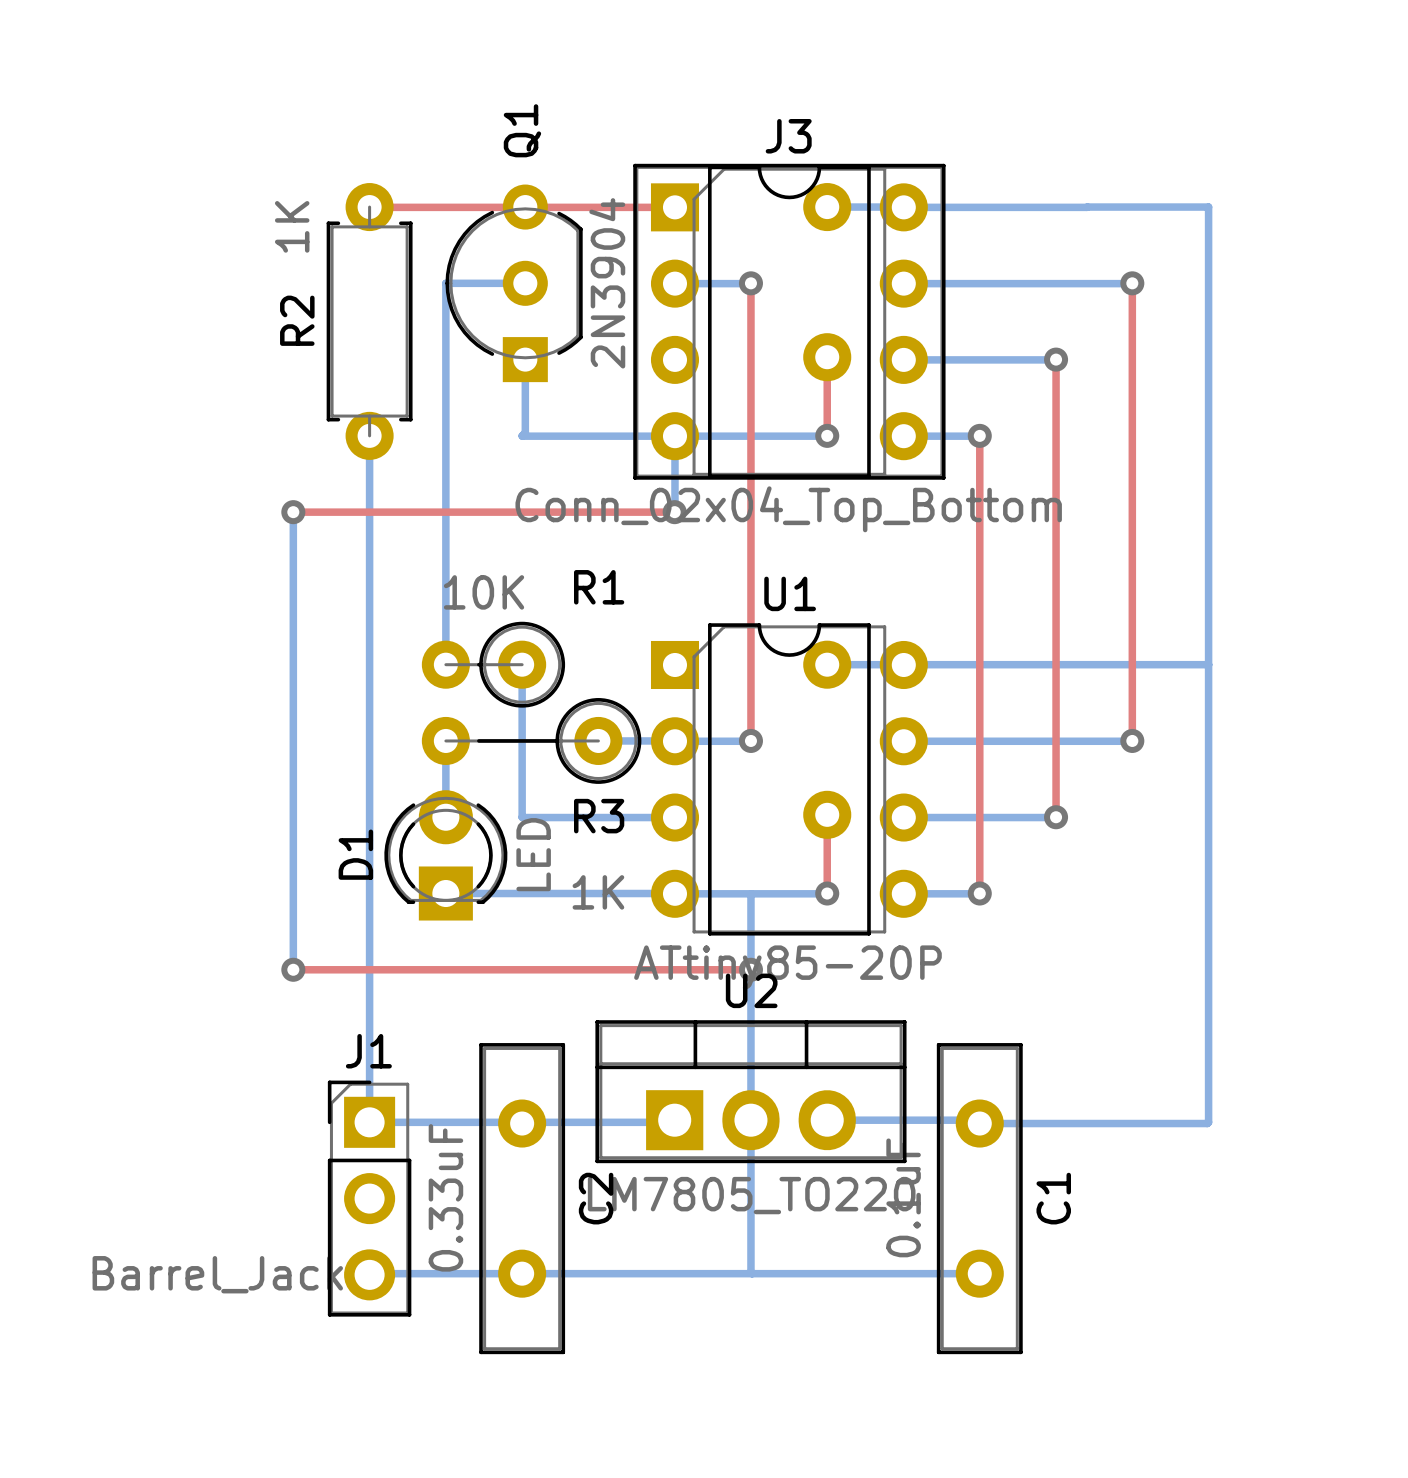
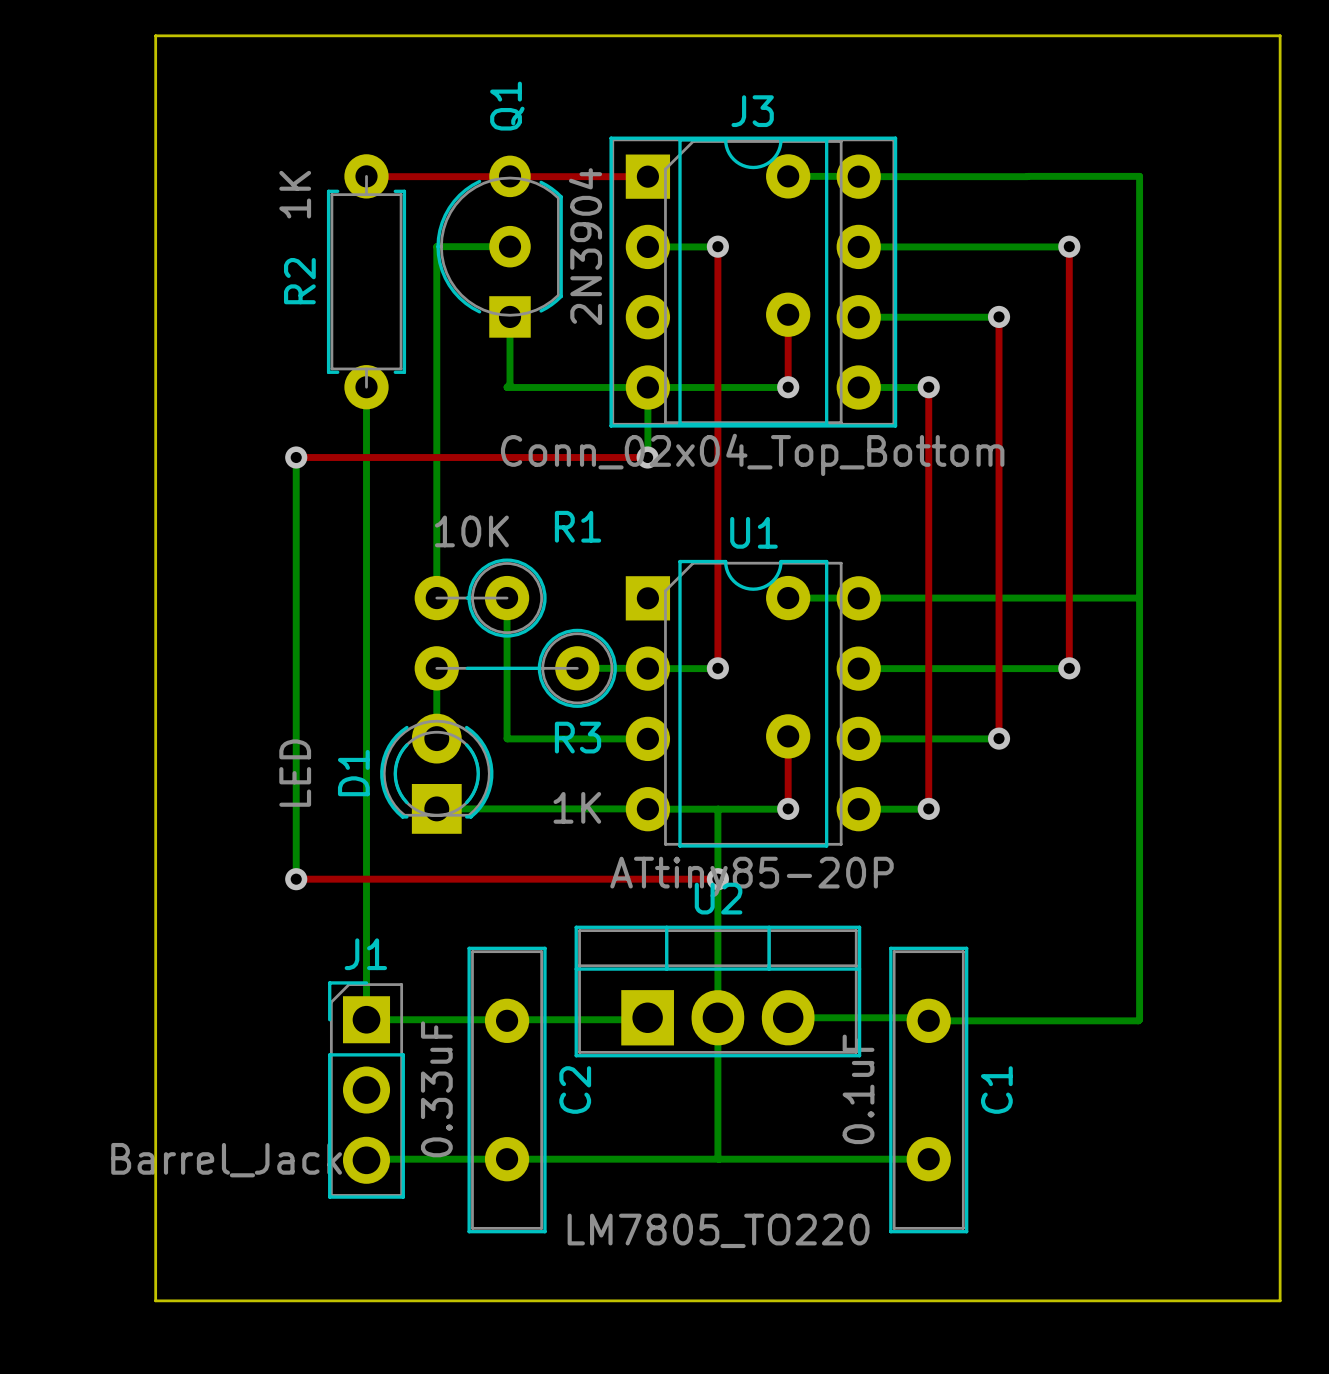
board edge: none -> (155, 35) (1280, 35) (1280, 1300) (155, 1300) (155, 35)
D1 value position: LED (533, 854) -> LED (295, 773)
U2 value position: LM7805_TO220 (751, 1195) -> LM7805_TO220 (718, 1230)

